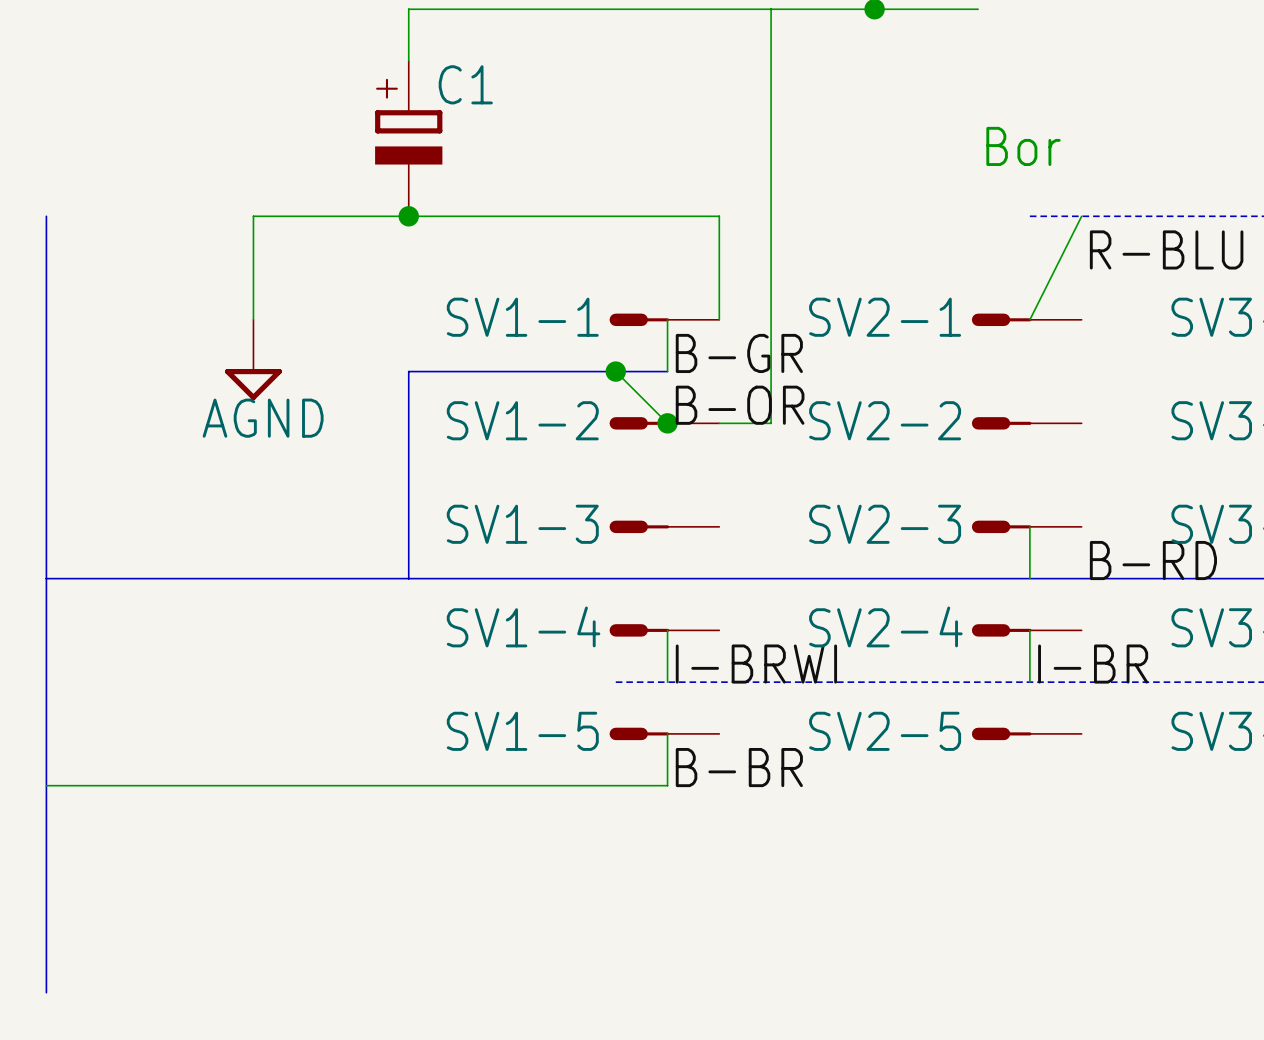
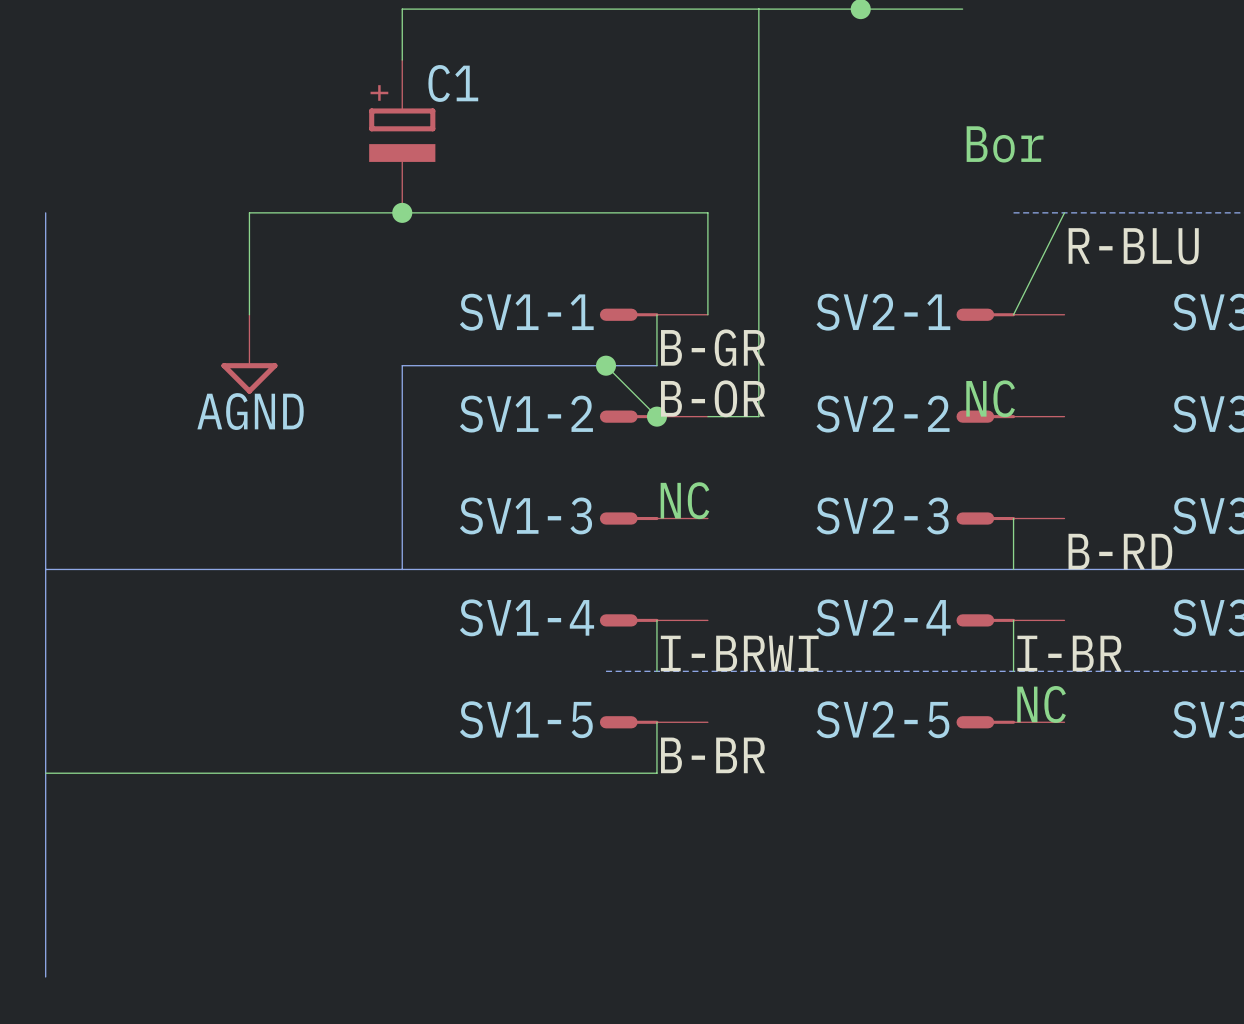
text: none -> NC (990, 398)
text: none -> NC (684, 500)
text: none -> NC (1041, 704)

